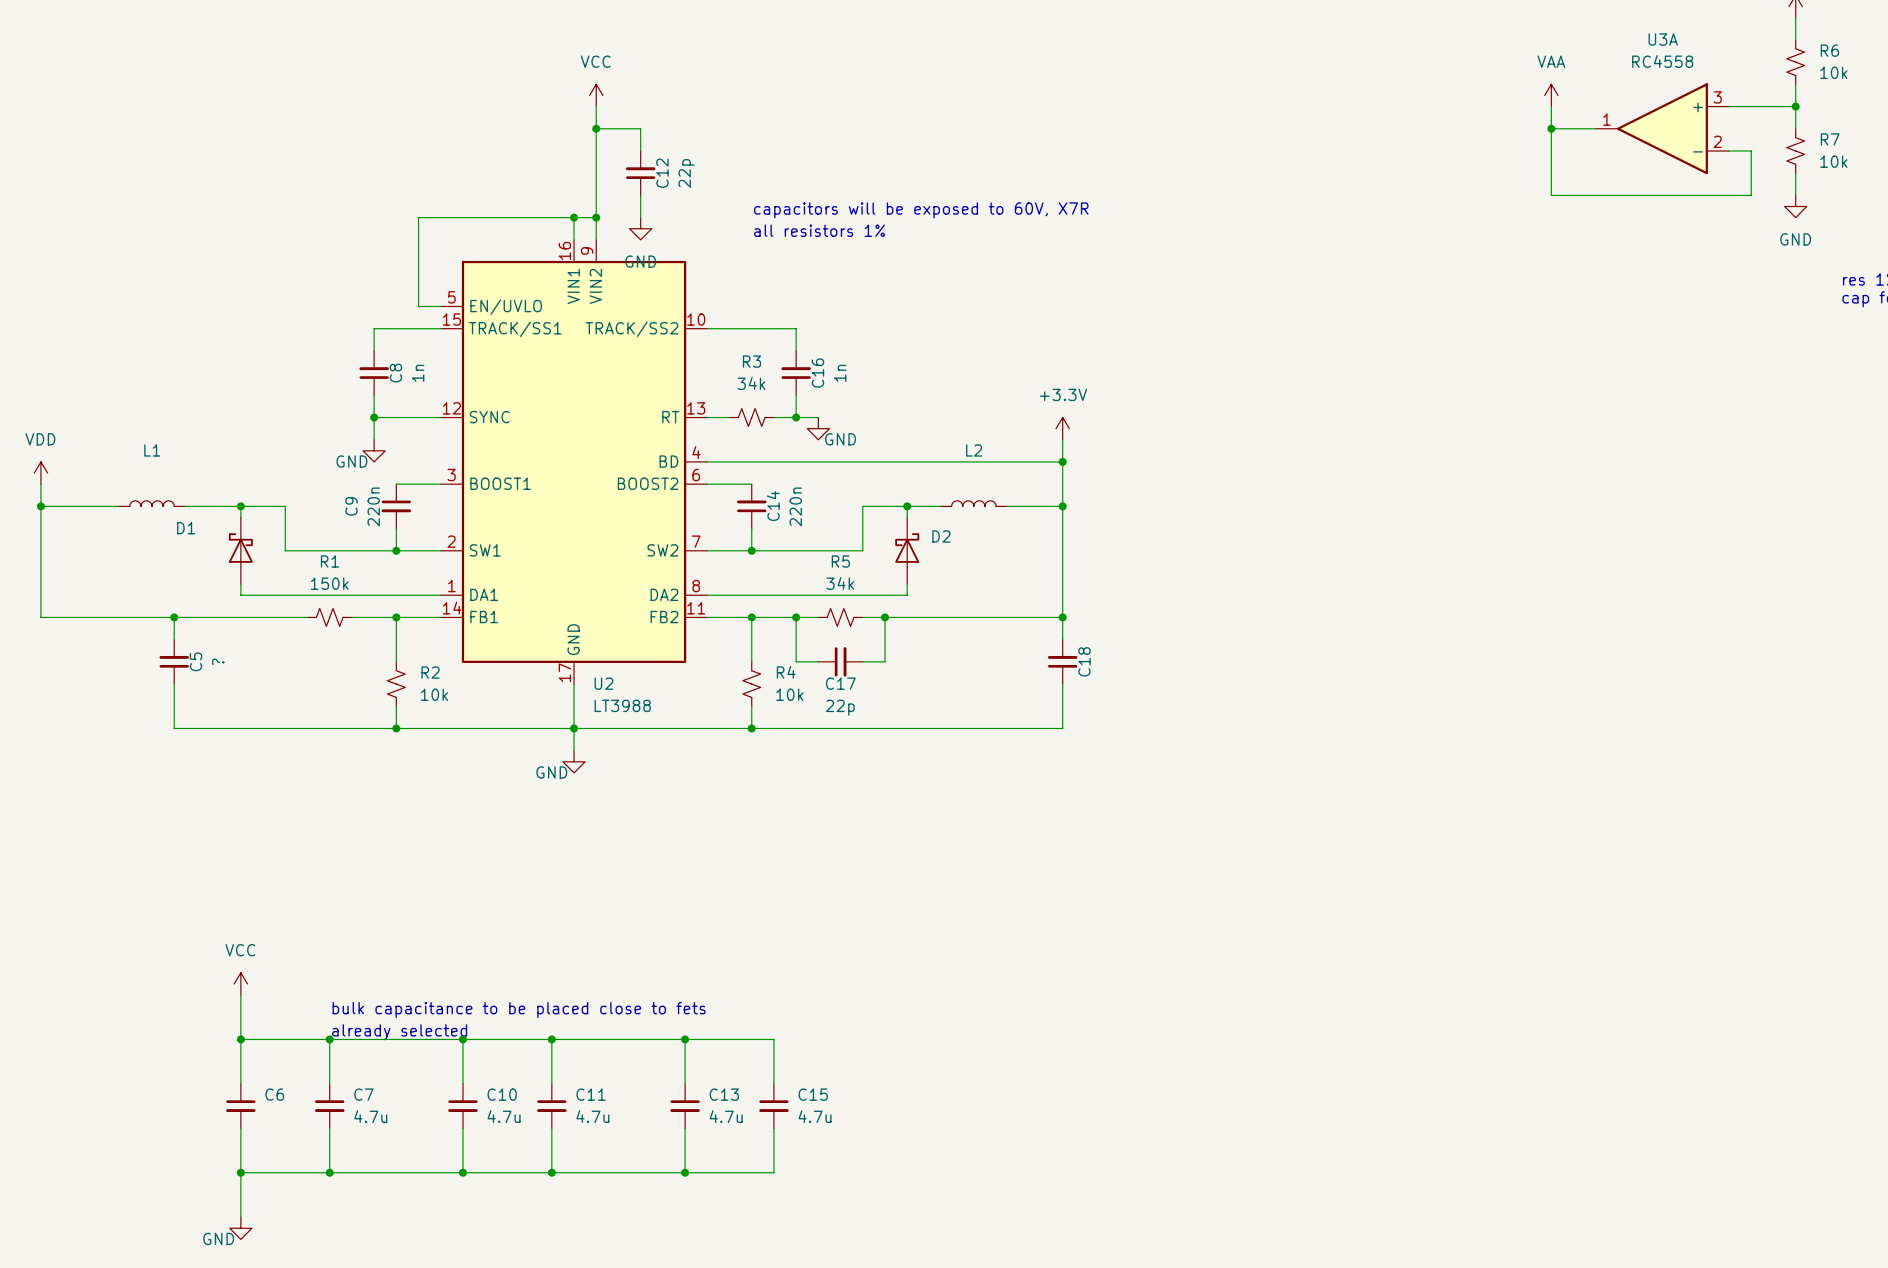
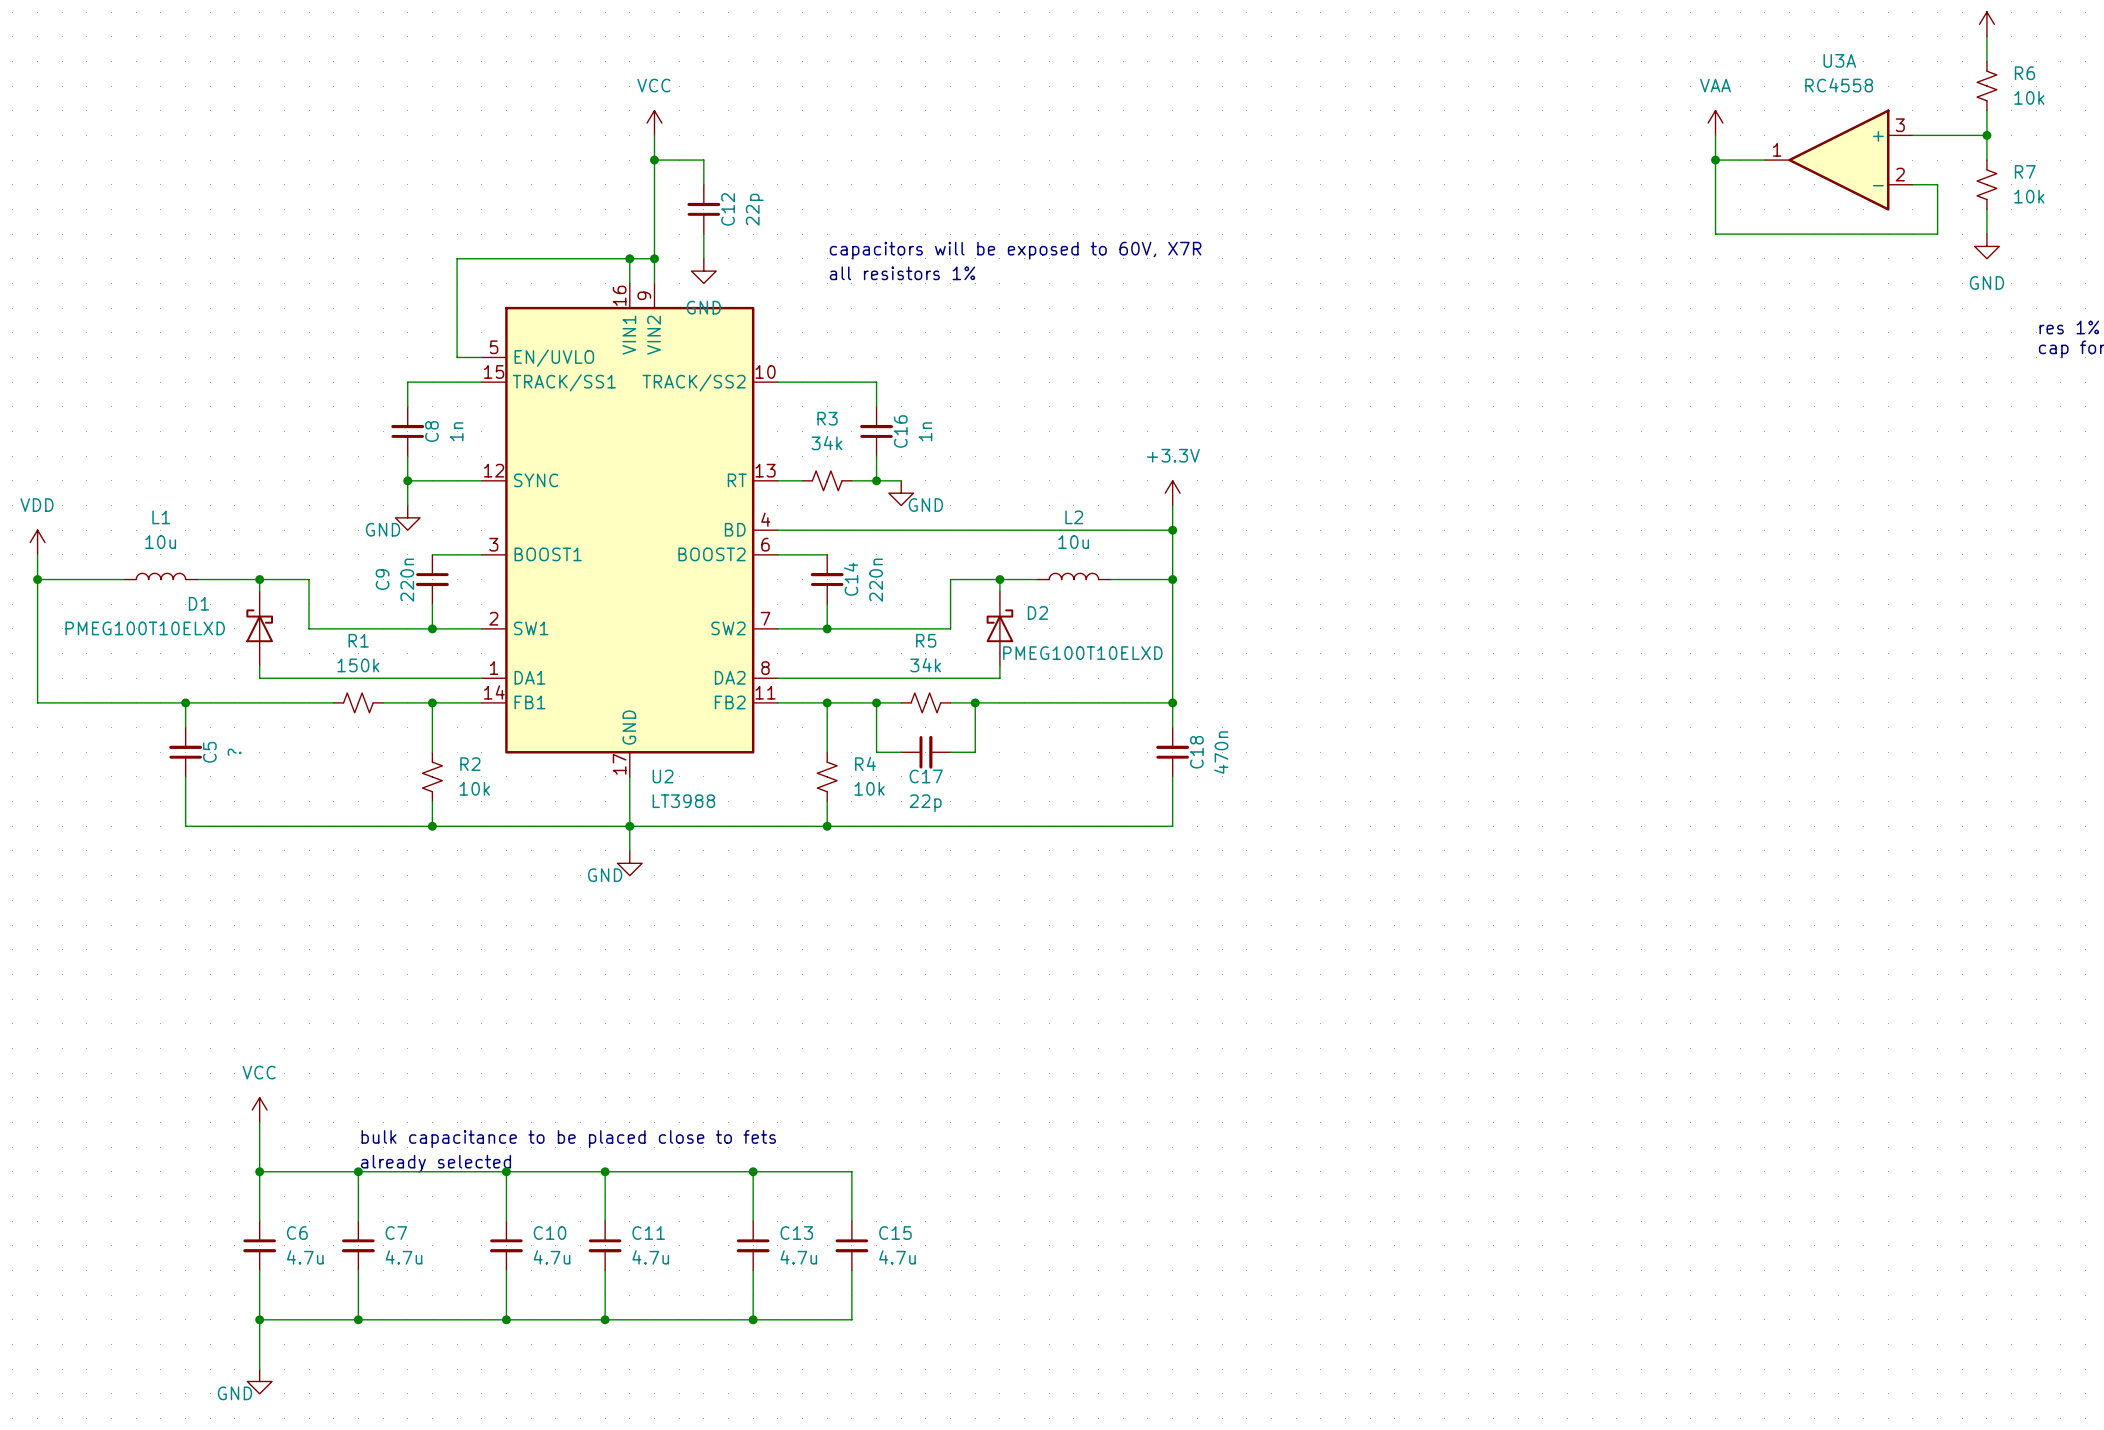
L1 value: none -> 10u (160, 542)
L2 value: none -> 10u (1073, 542)
D1 value: none -> PMEG100T10ELXD (145, 628)
D2 value: none -> PMEG100T10ELXD (1082, 653)
C18 value: none -> 470n (1221, 752)
C6 value: none -> 4.7u (305, 1257)

